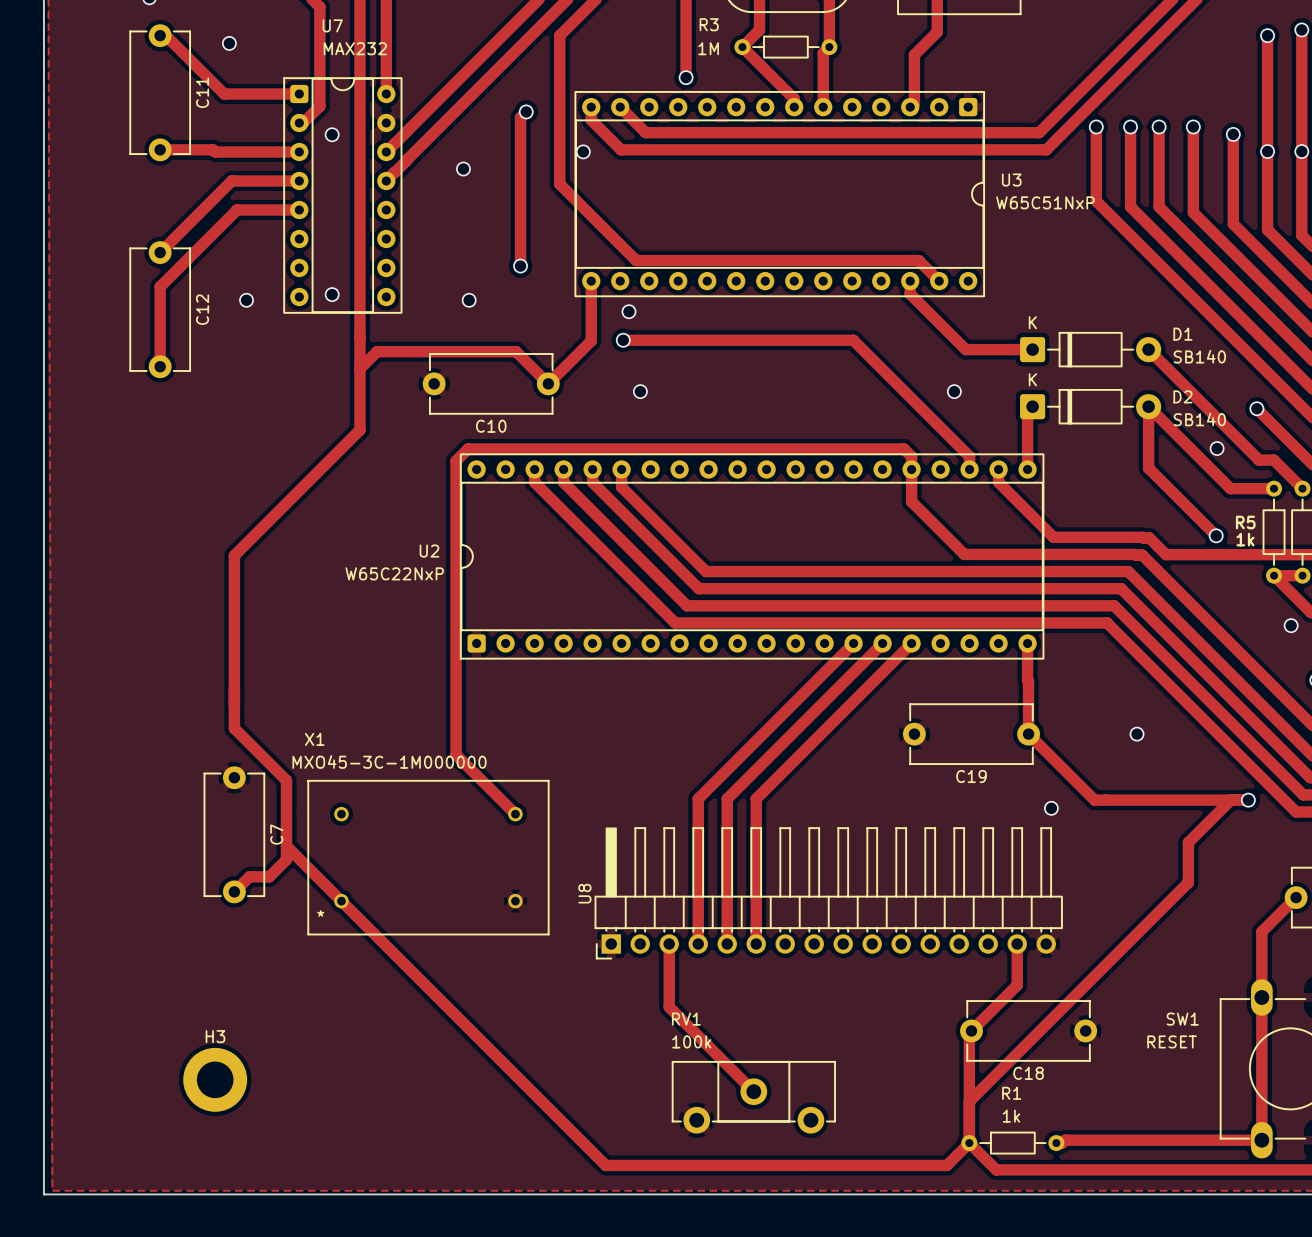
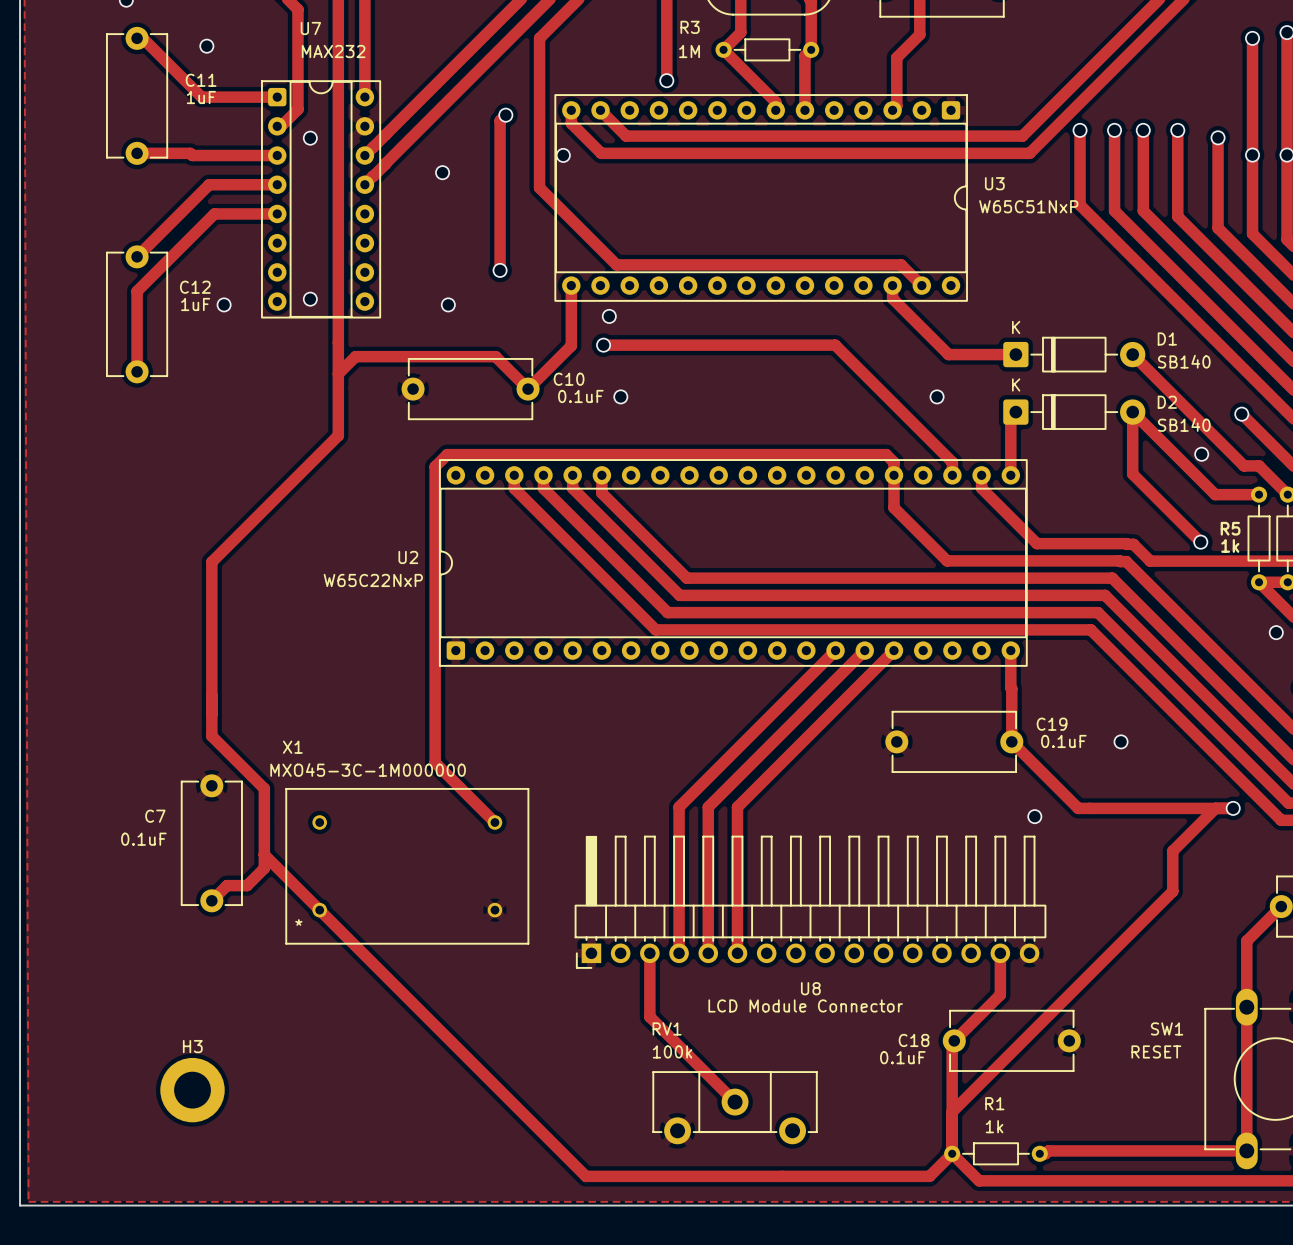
C11 name rotation: 0° (202, 92) -> 90° clockwise (201, 80)
C11 value: none -> 1uF (201, 97)
C12 value: none -> 1uF (195, 304)
C12 name rotation: 0° (202, 309) -> 90° clockwise (195, 287)
C10 value: none -> 0.1uF (580, 396)
C10 name position: C10 (491, 426) -> C10 (569, 379)
C19 value: none -> 0.1uF (1063, 741)
C19 name position: C19 (971, 776) -> C19 (1052, 724)
C7 value: none -> 0.1uF (143, 839)
C7 name rotation: 0° (276, 834) -> 90° clockwise (155, 816)
C7 name position: C7 (276, 834) -> C7 (155, 816)
U8 name rotation: 0° (584, 893) -> 90° clockwise (810, 988)
U8 name position: U8 (584, 893) -> U8 (810, 988)
U8 value: none -> LCD Module Connector (805, 1005)
C18 value: none -> 0.1uF (902, 1057)
C18 name position: C18 (1028, 1073) -> C18 (914, 1040)

